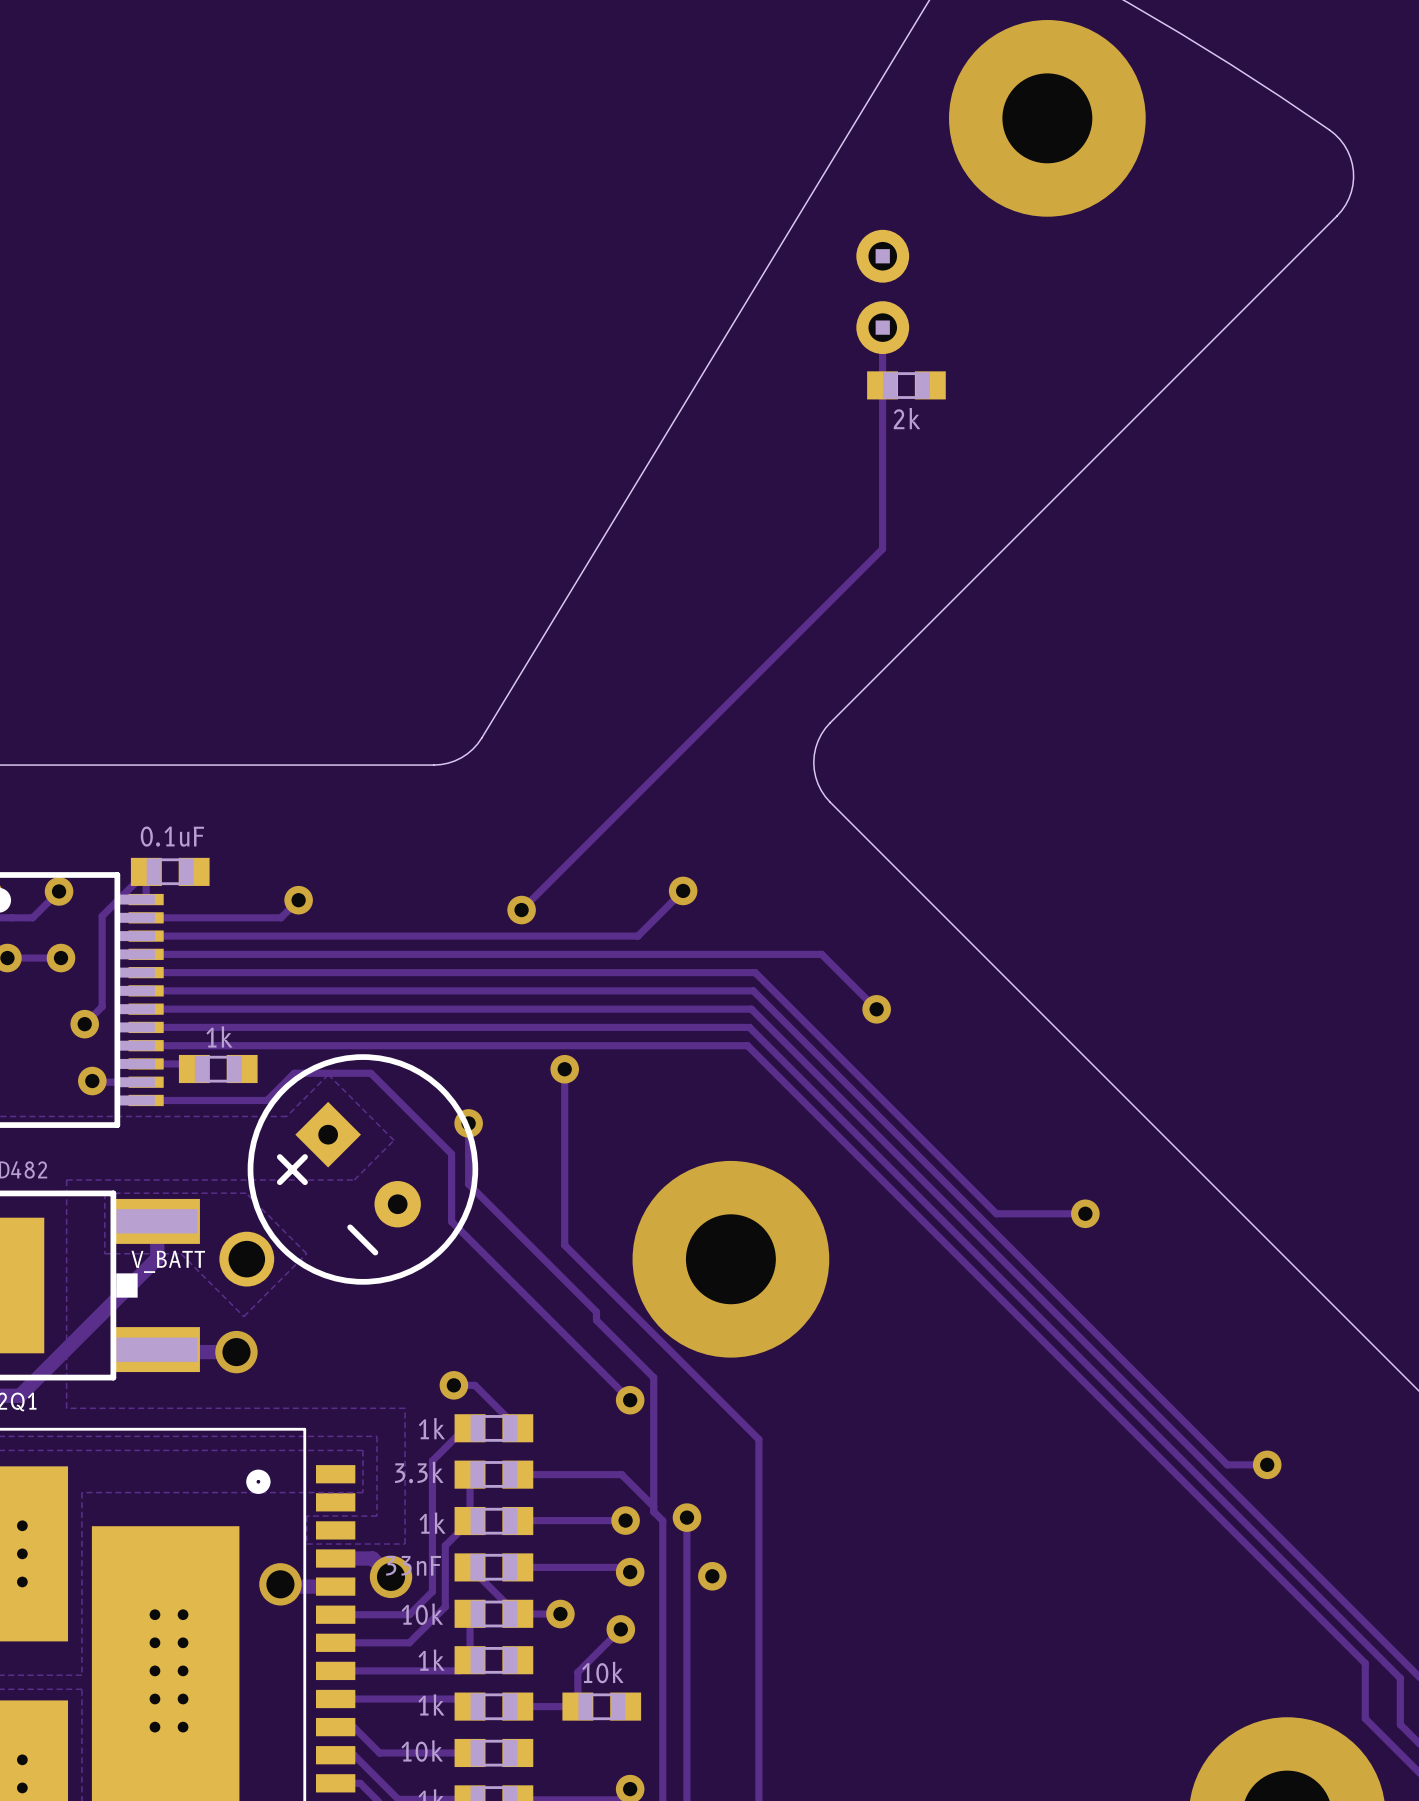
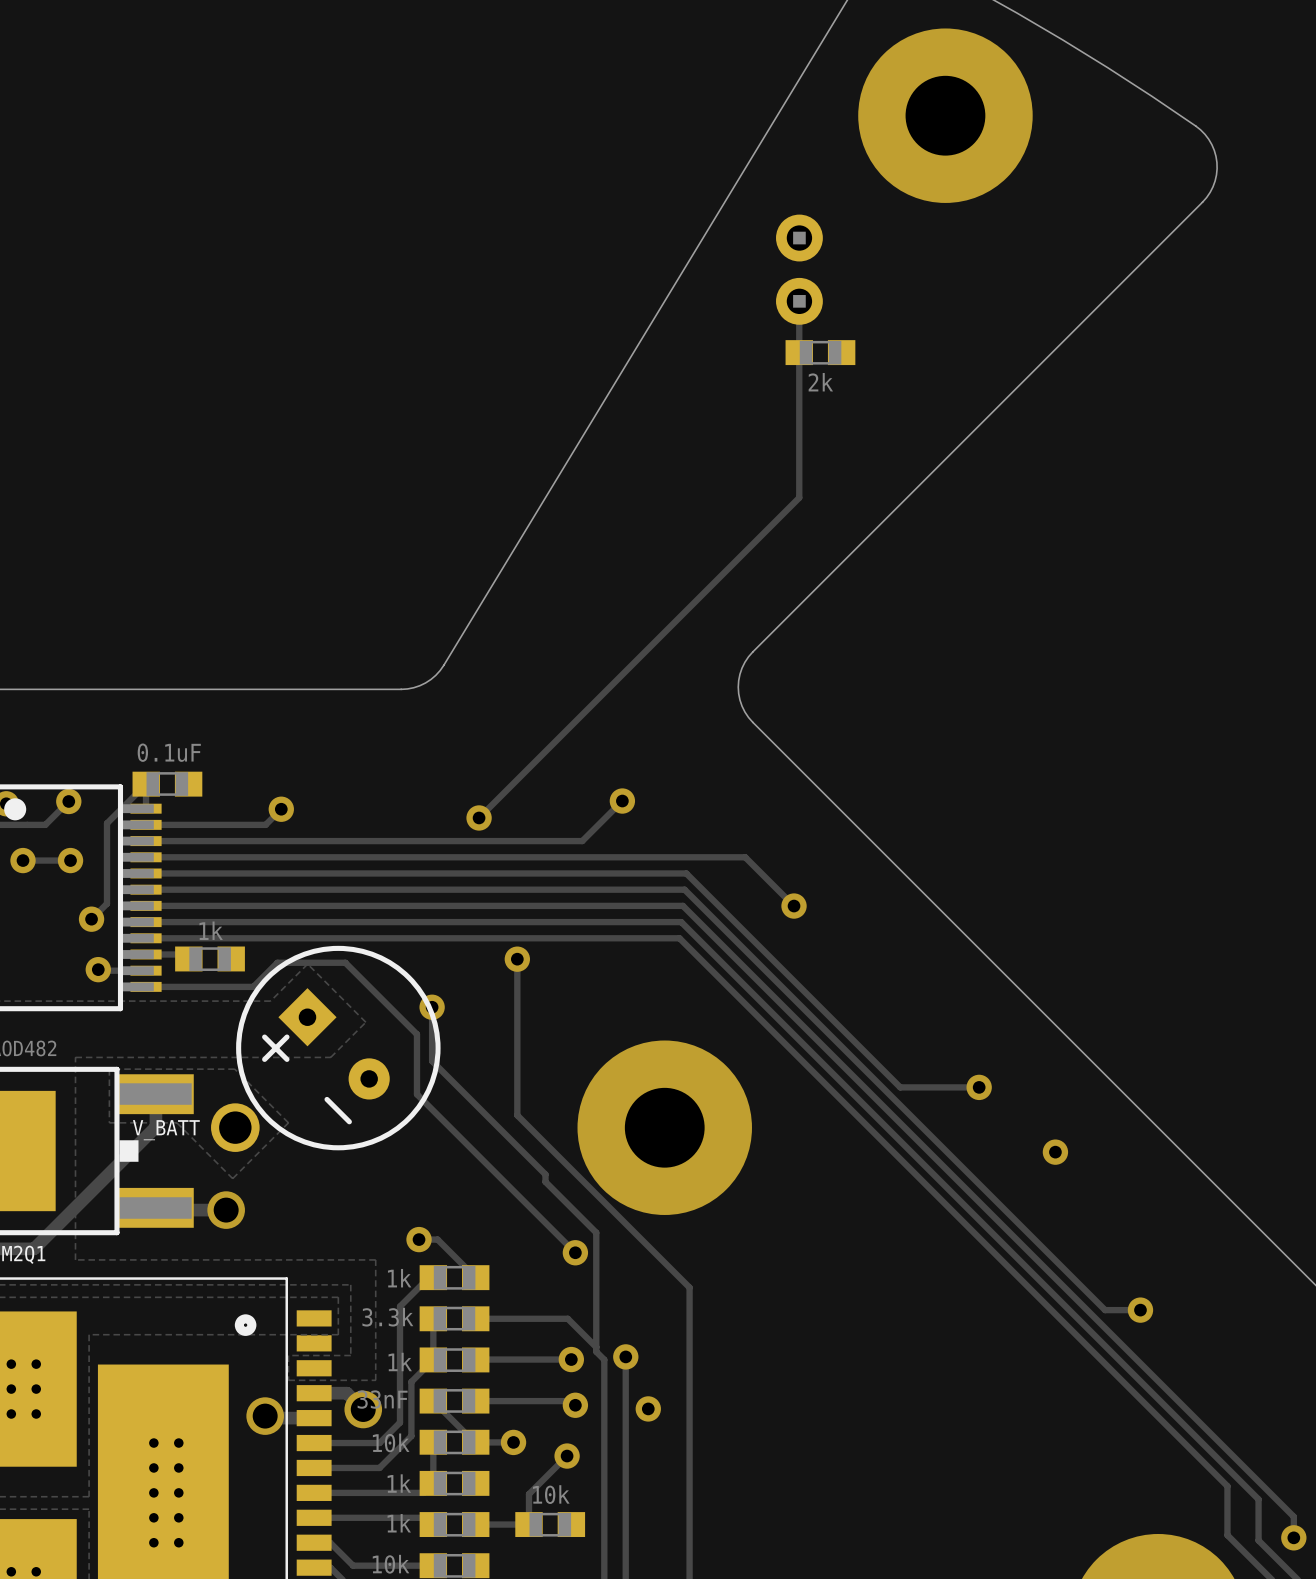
via: none -> (1055, 1152)

